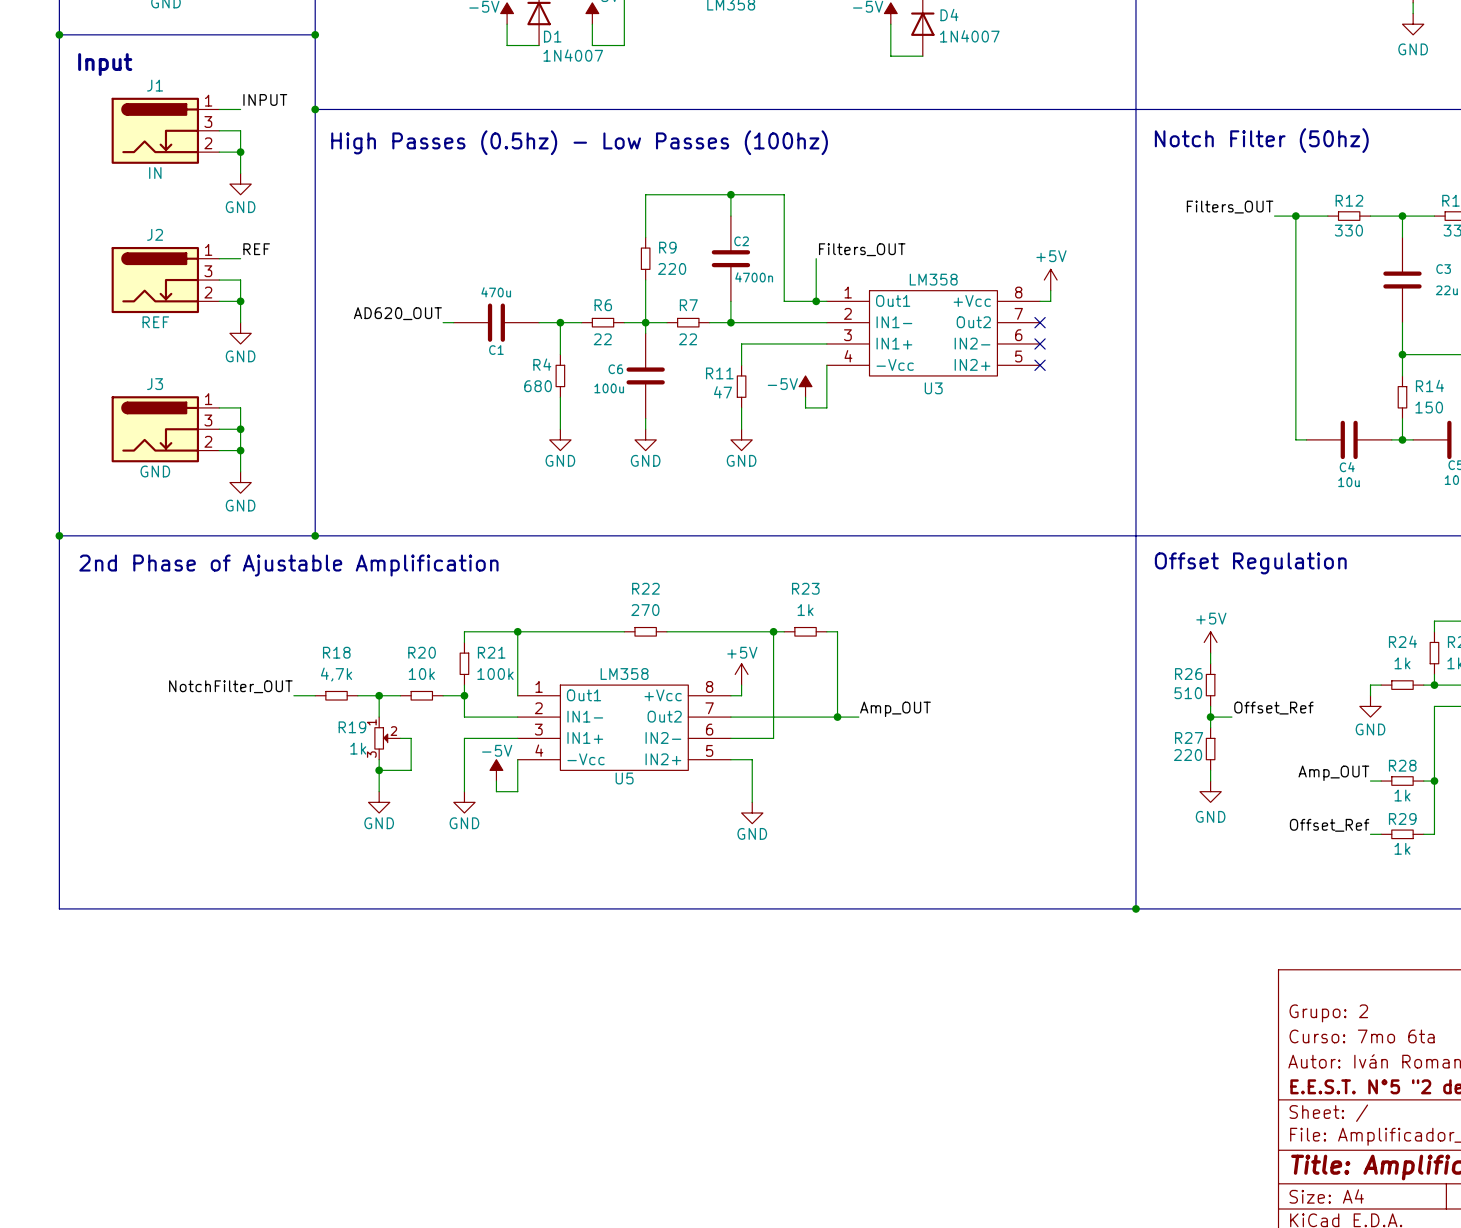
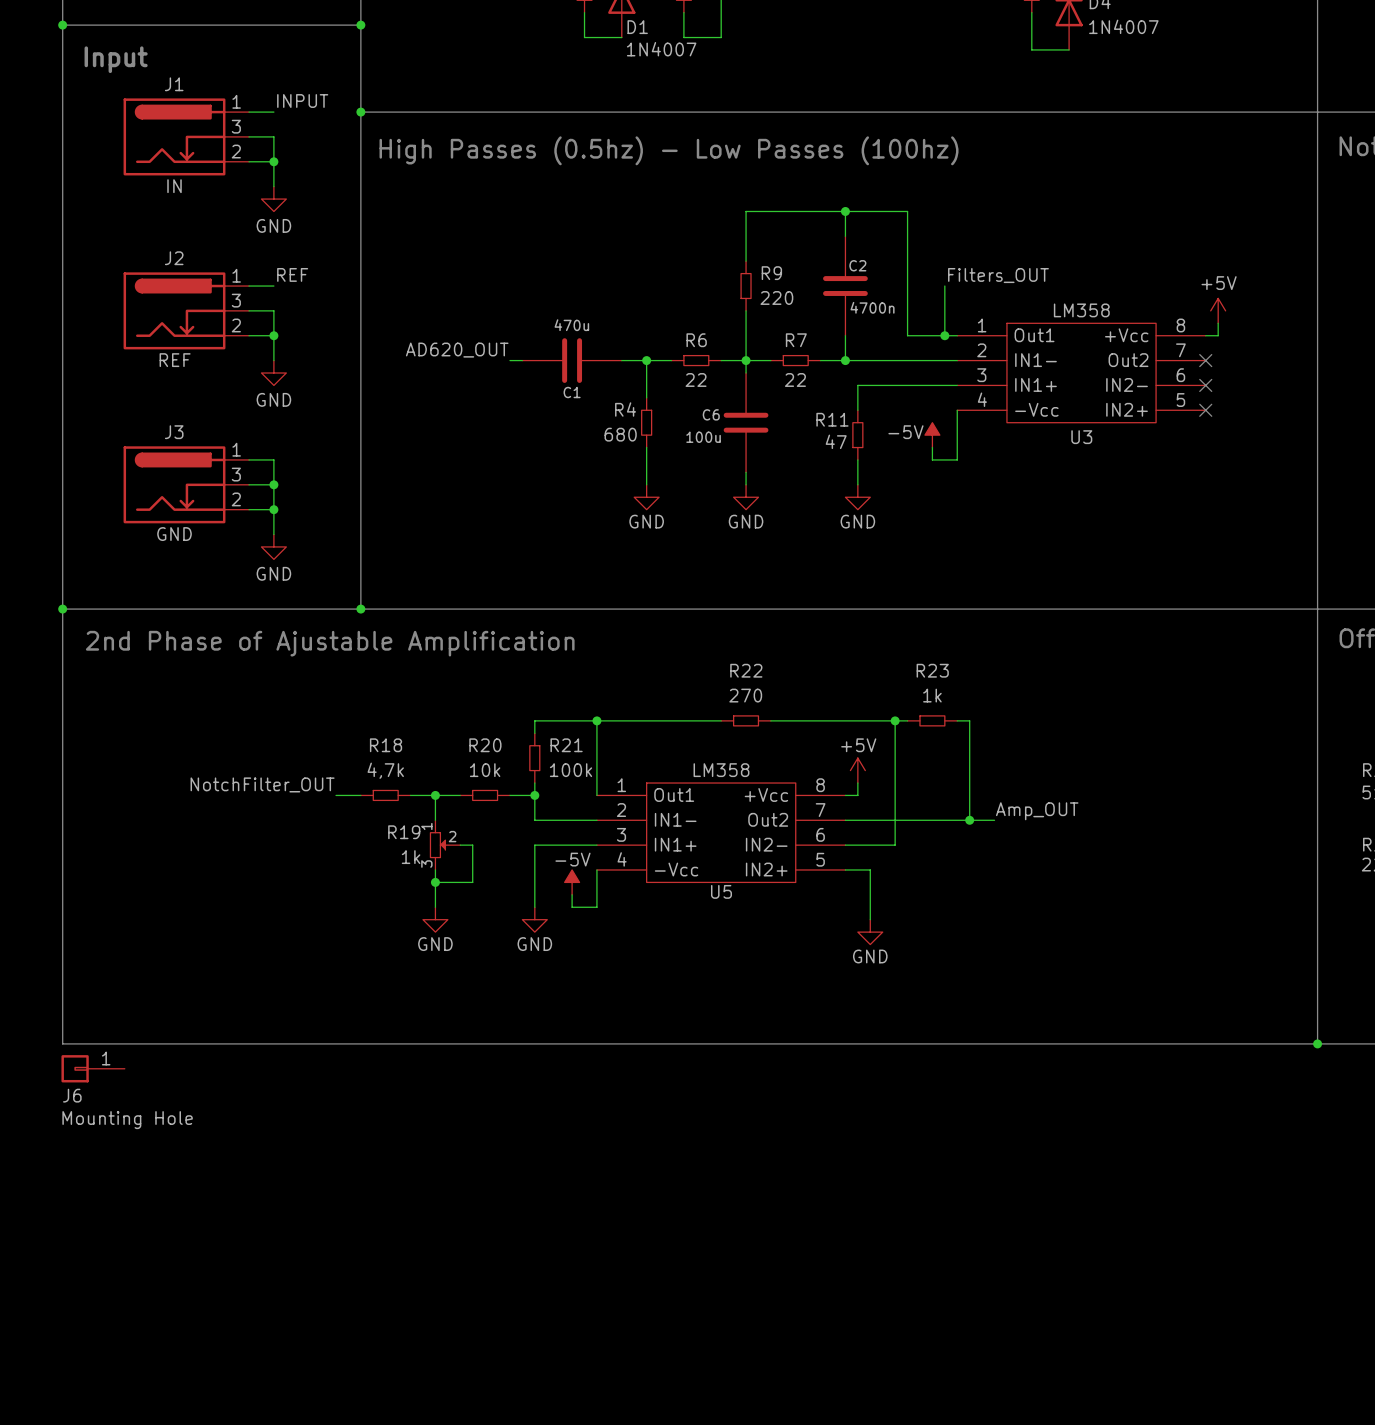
J6: none -> Mounting Hole (93, 1068)

